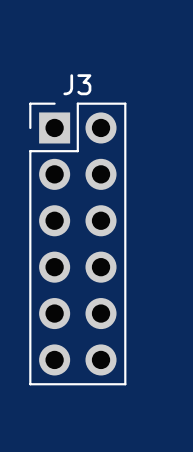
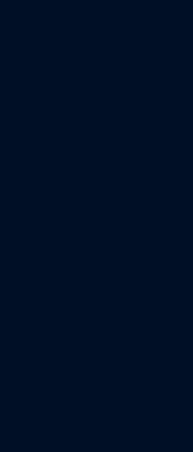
J3: (77, 243) -> none

